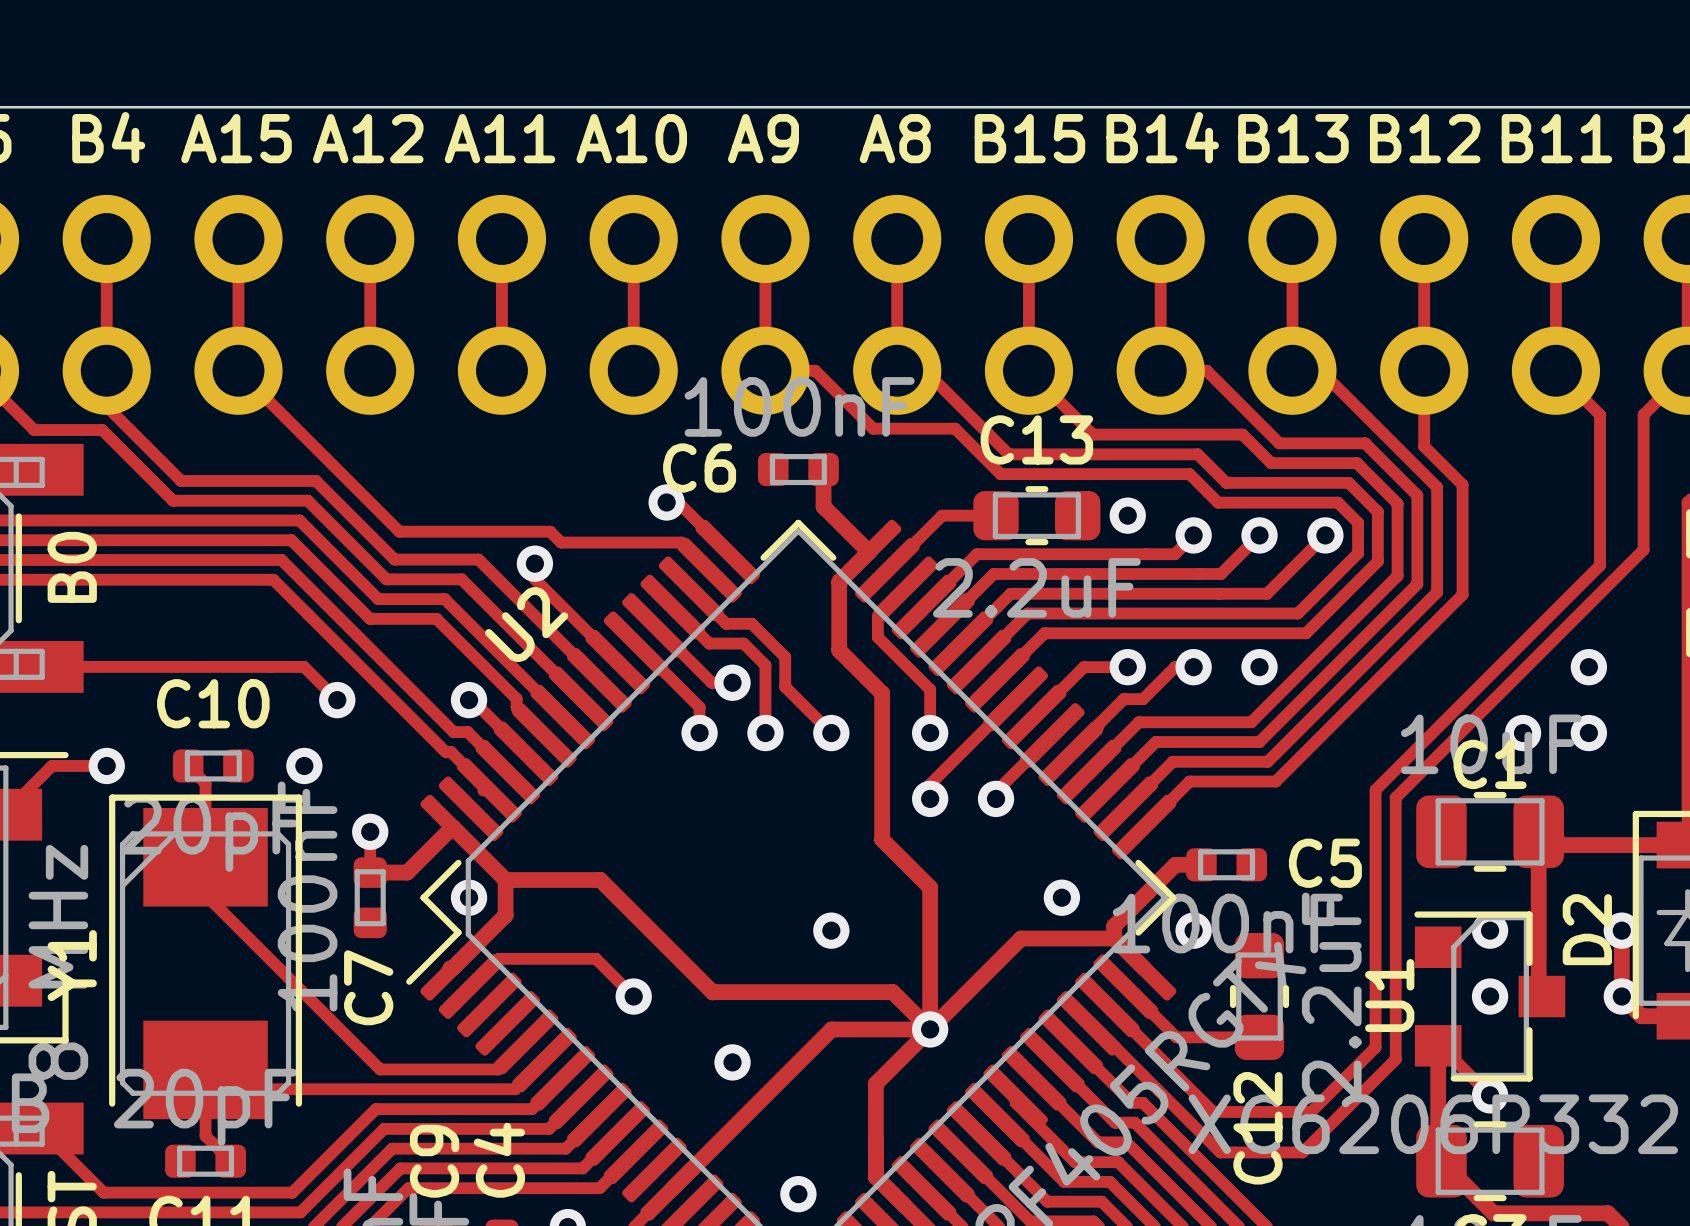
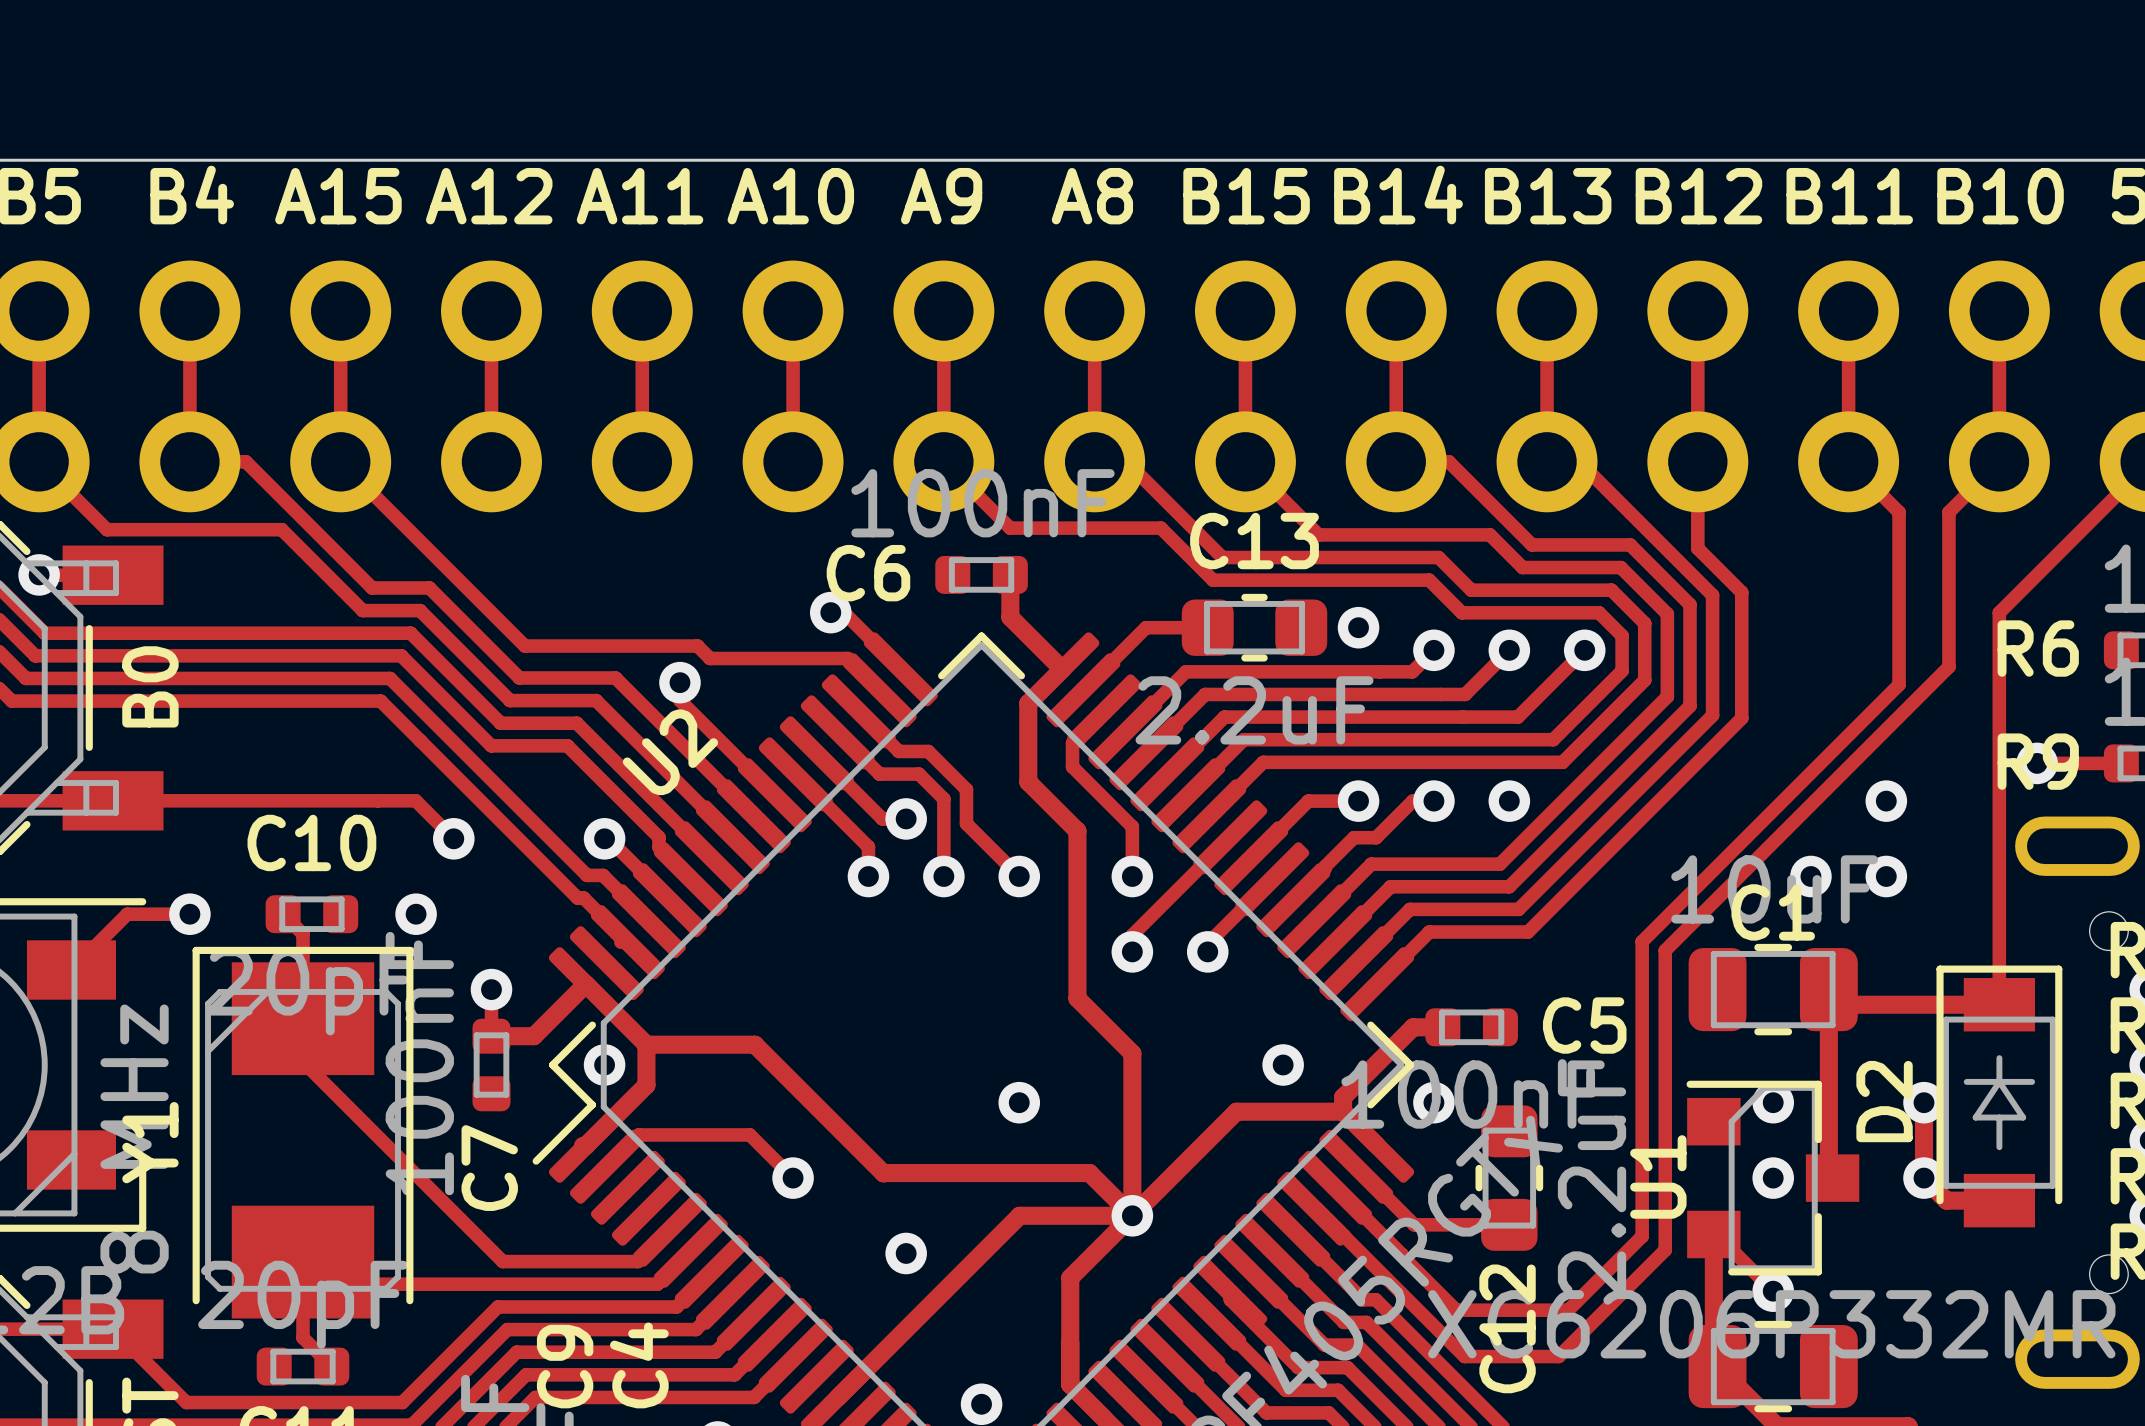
track: (106, 370) (106, 406) (181, 480) (265, 480) -> (189, 461) (245, 461) (372, 587)
track: (765, 370) (815, 370) (873, 428) -> (943, 461) (1010, 528) (1067, 528)
track: (102, 430) (172, 500) (257, 500) -> (184, 529) (281, 529) (362, 610)

